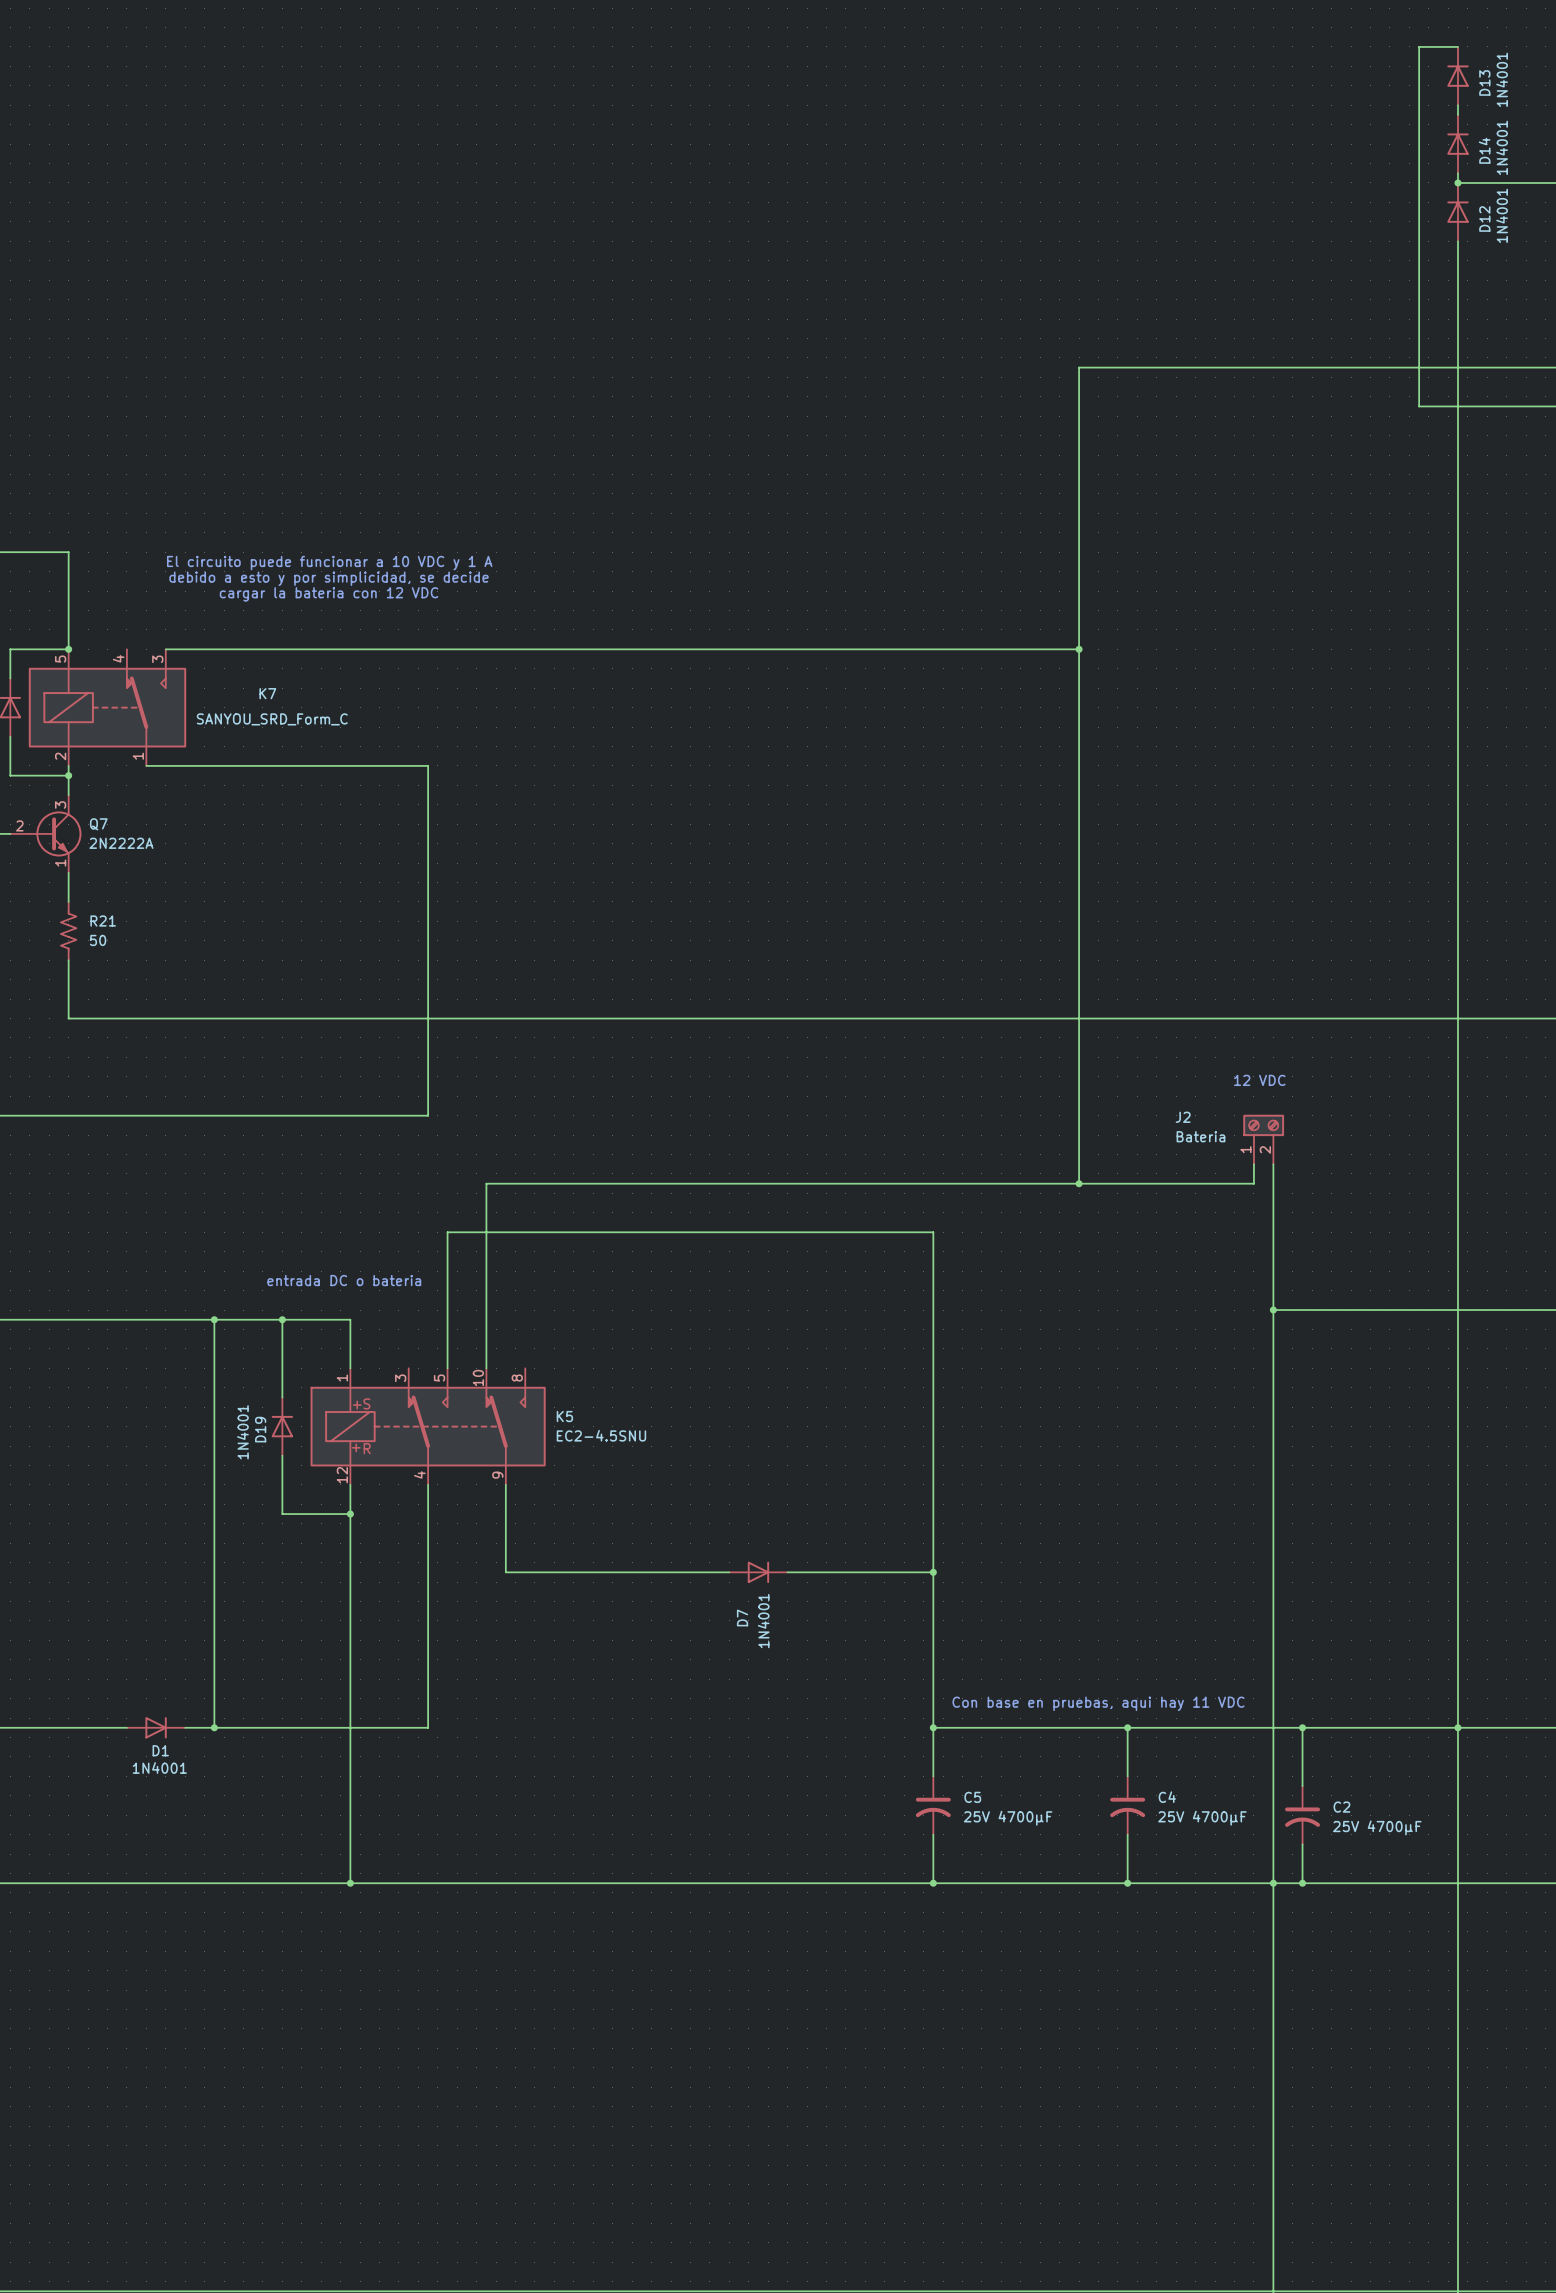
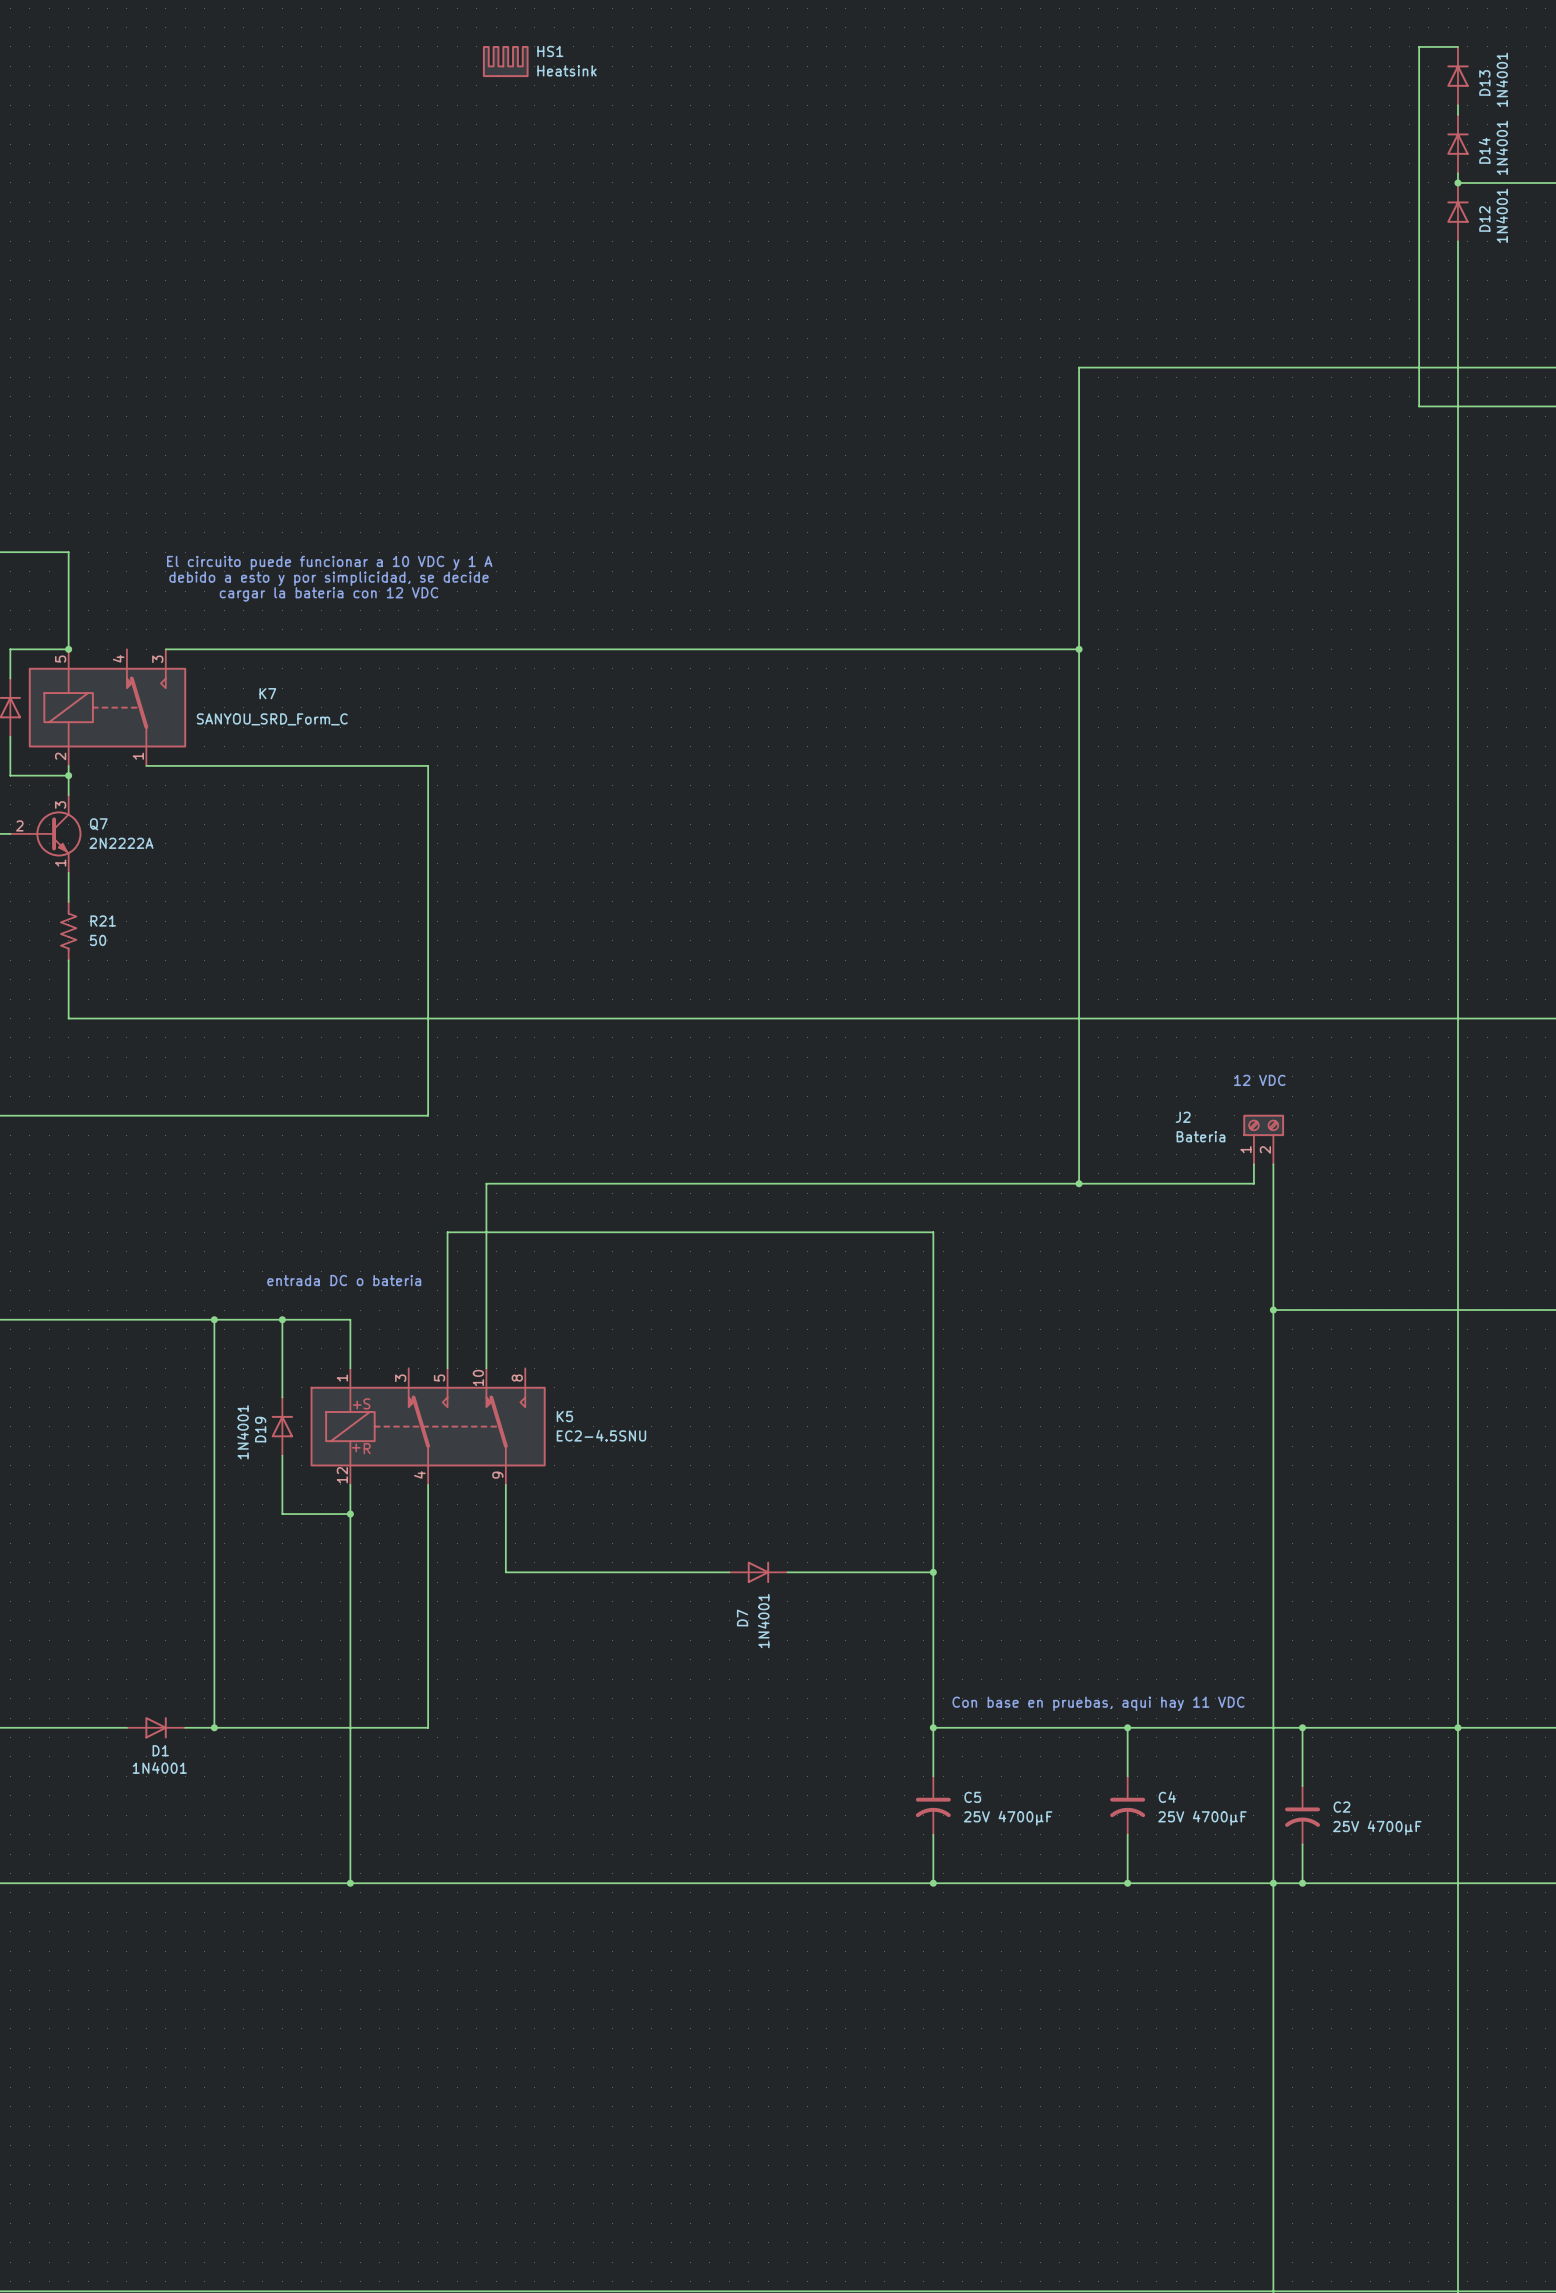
HS1: none -> Heatsink (505, 61)

